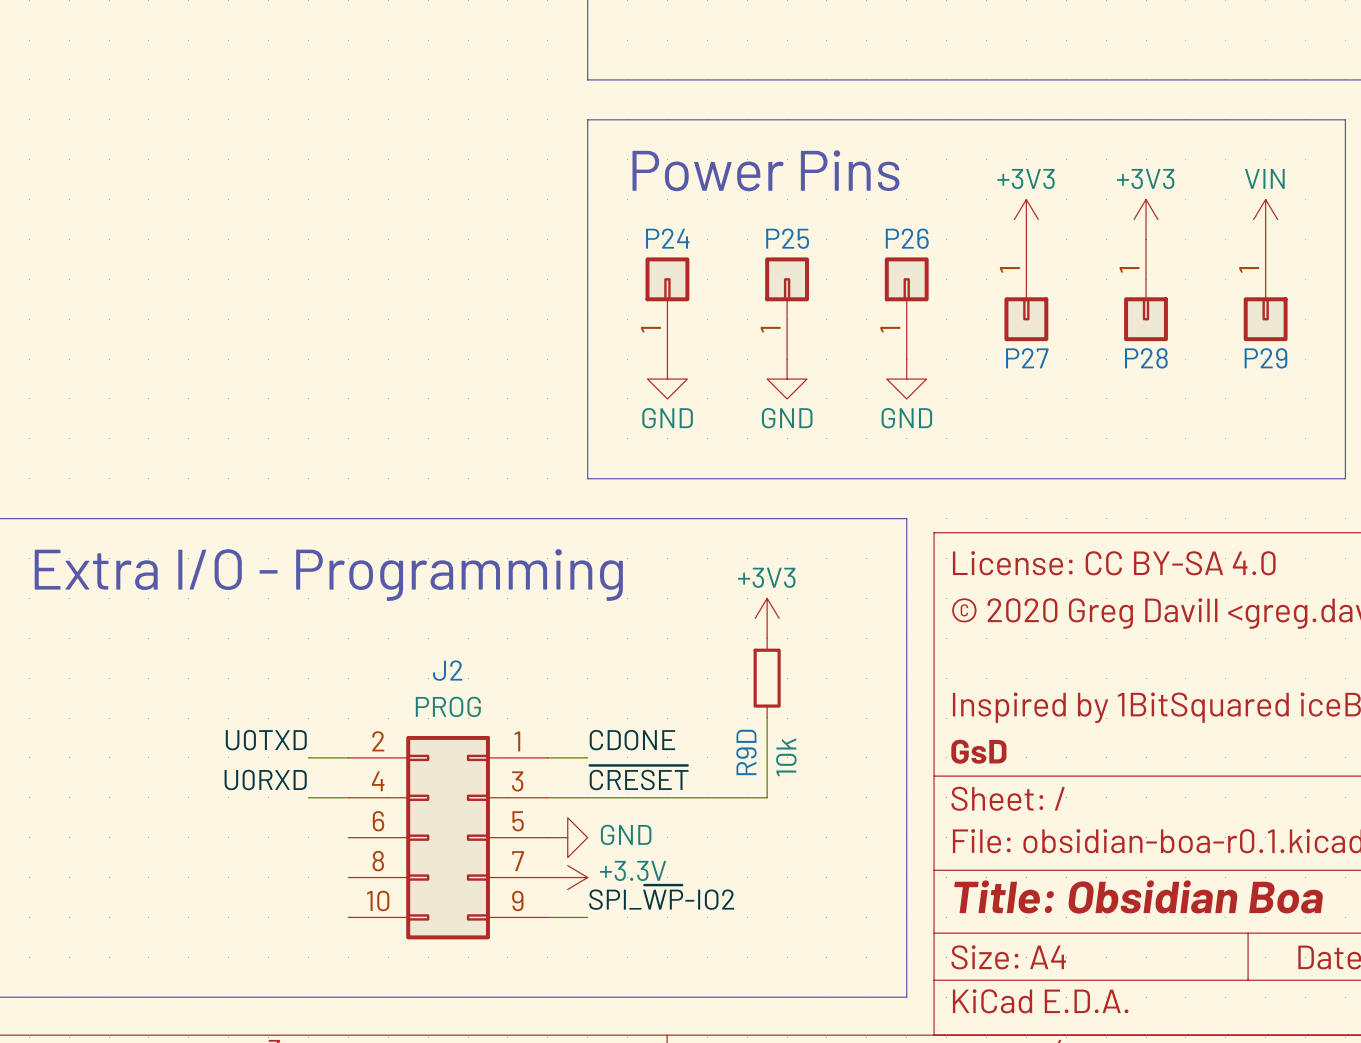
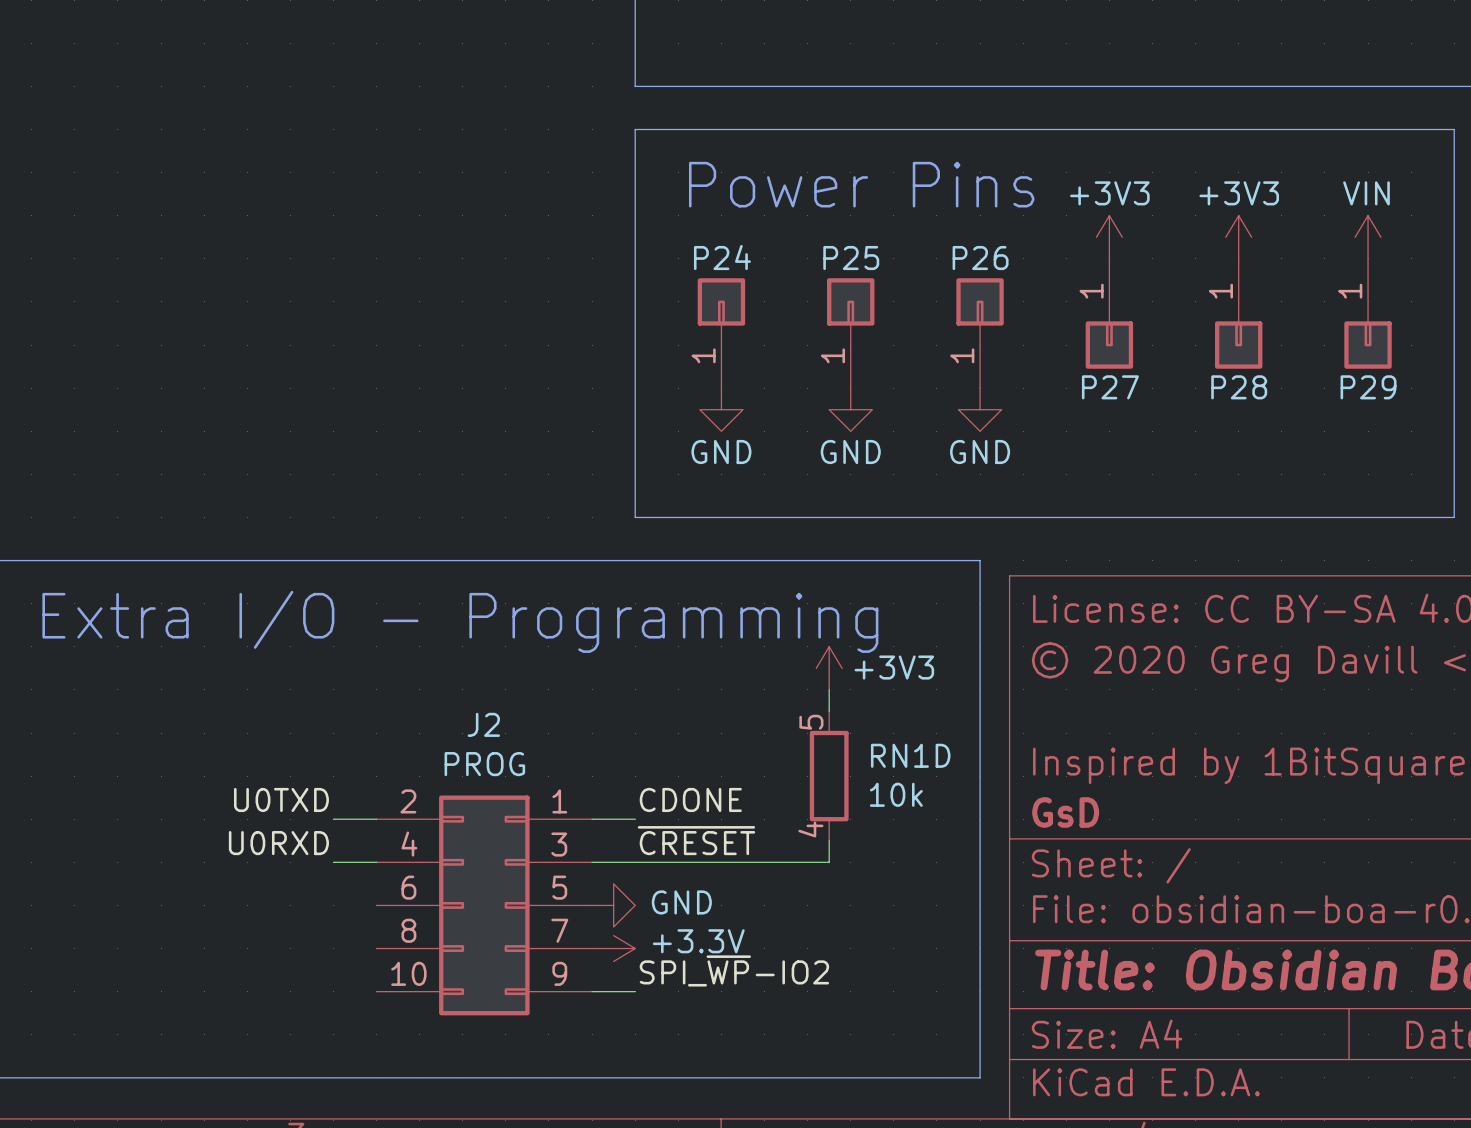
power symbol text position: +3V3 (766, 577) -> +3V3 (894, 667)
R9D: 10k (767, 678) -> none
wire: (767, 718) (767, 777) -> none
RN1D: none -> 10k (829, 776)

